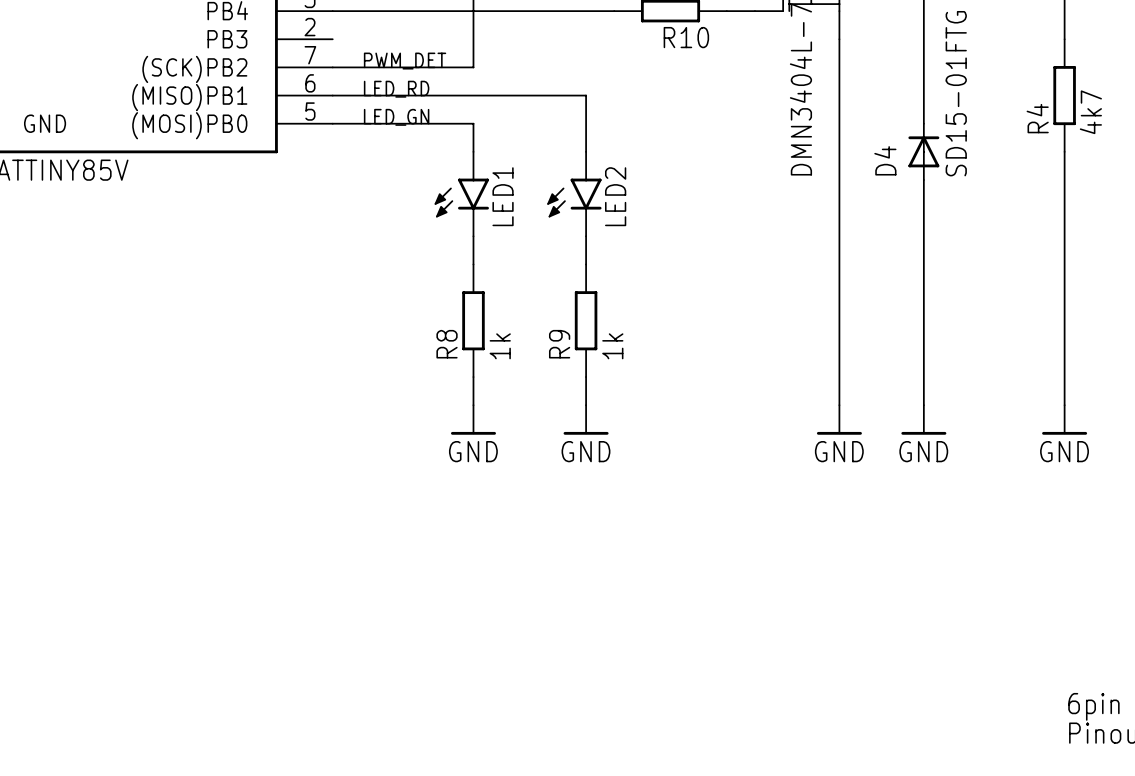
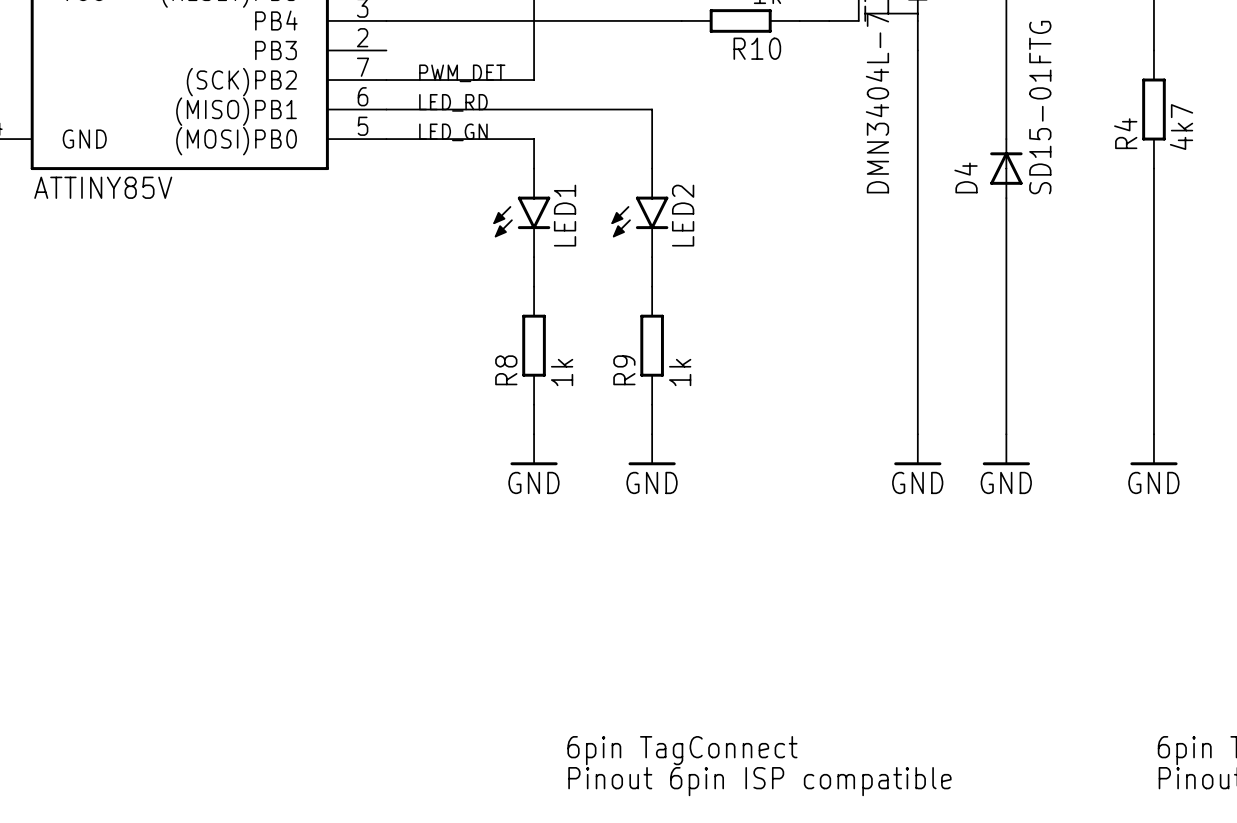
text: none -> 6pin TagConnect (682, 750)
text: none -> Pinout 6pin ISP compatible (759, 781)

